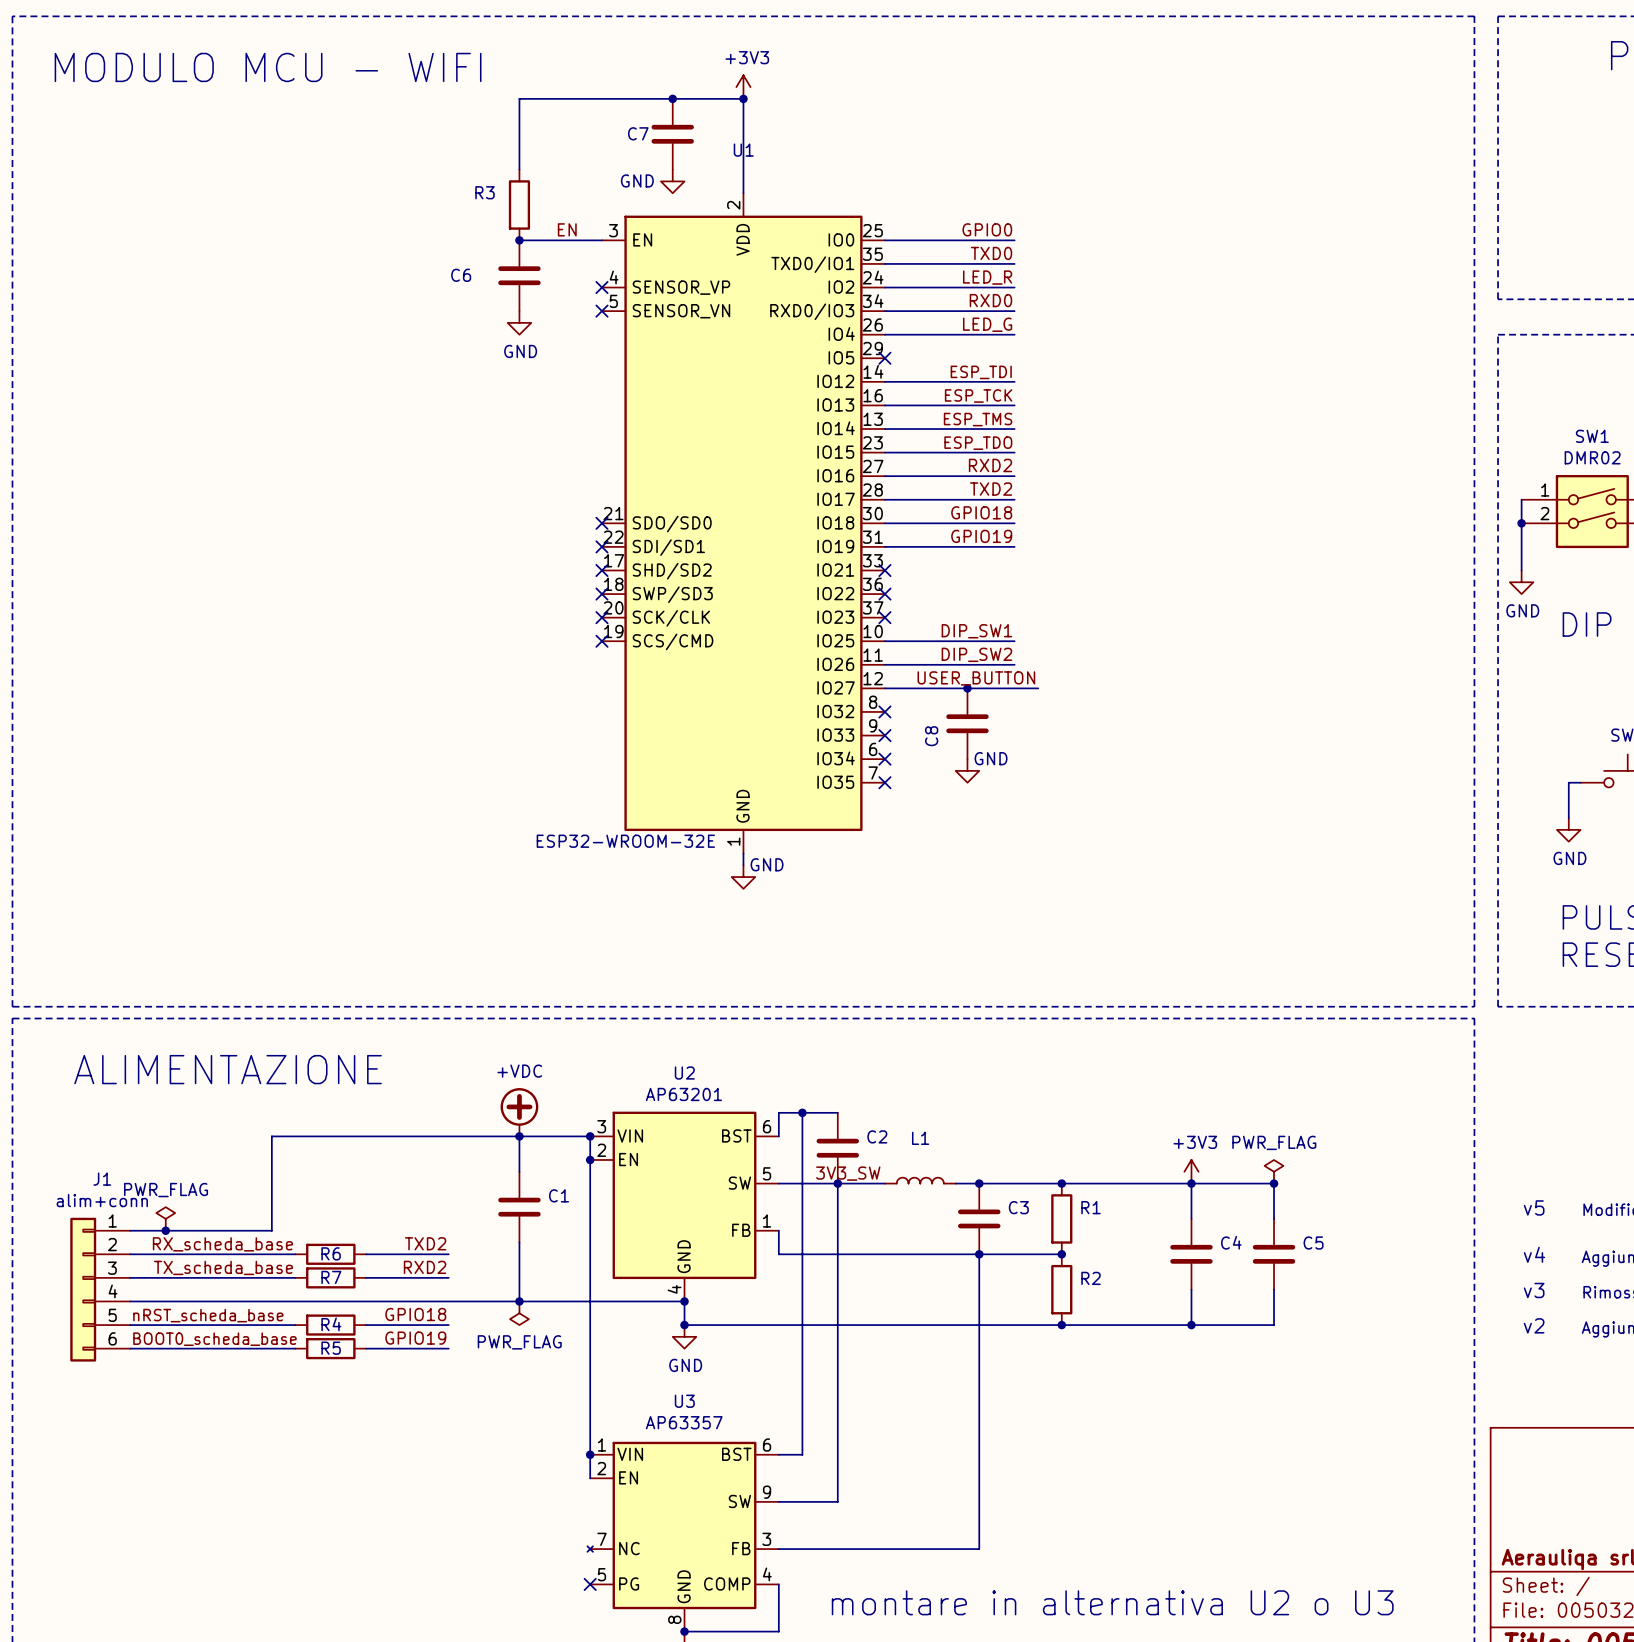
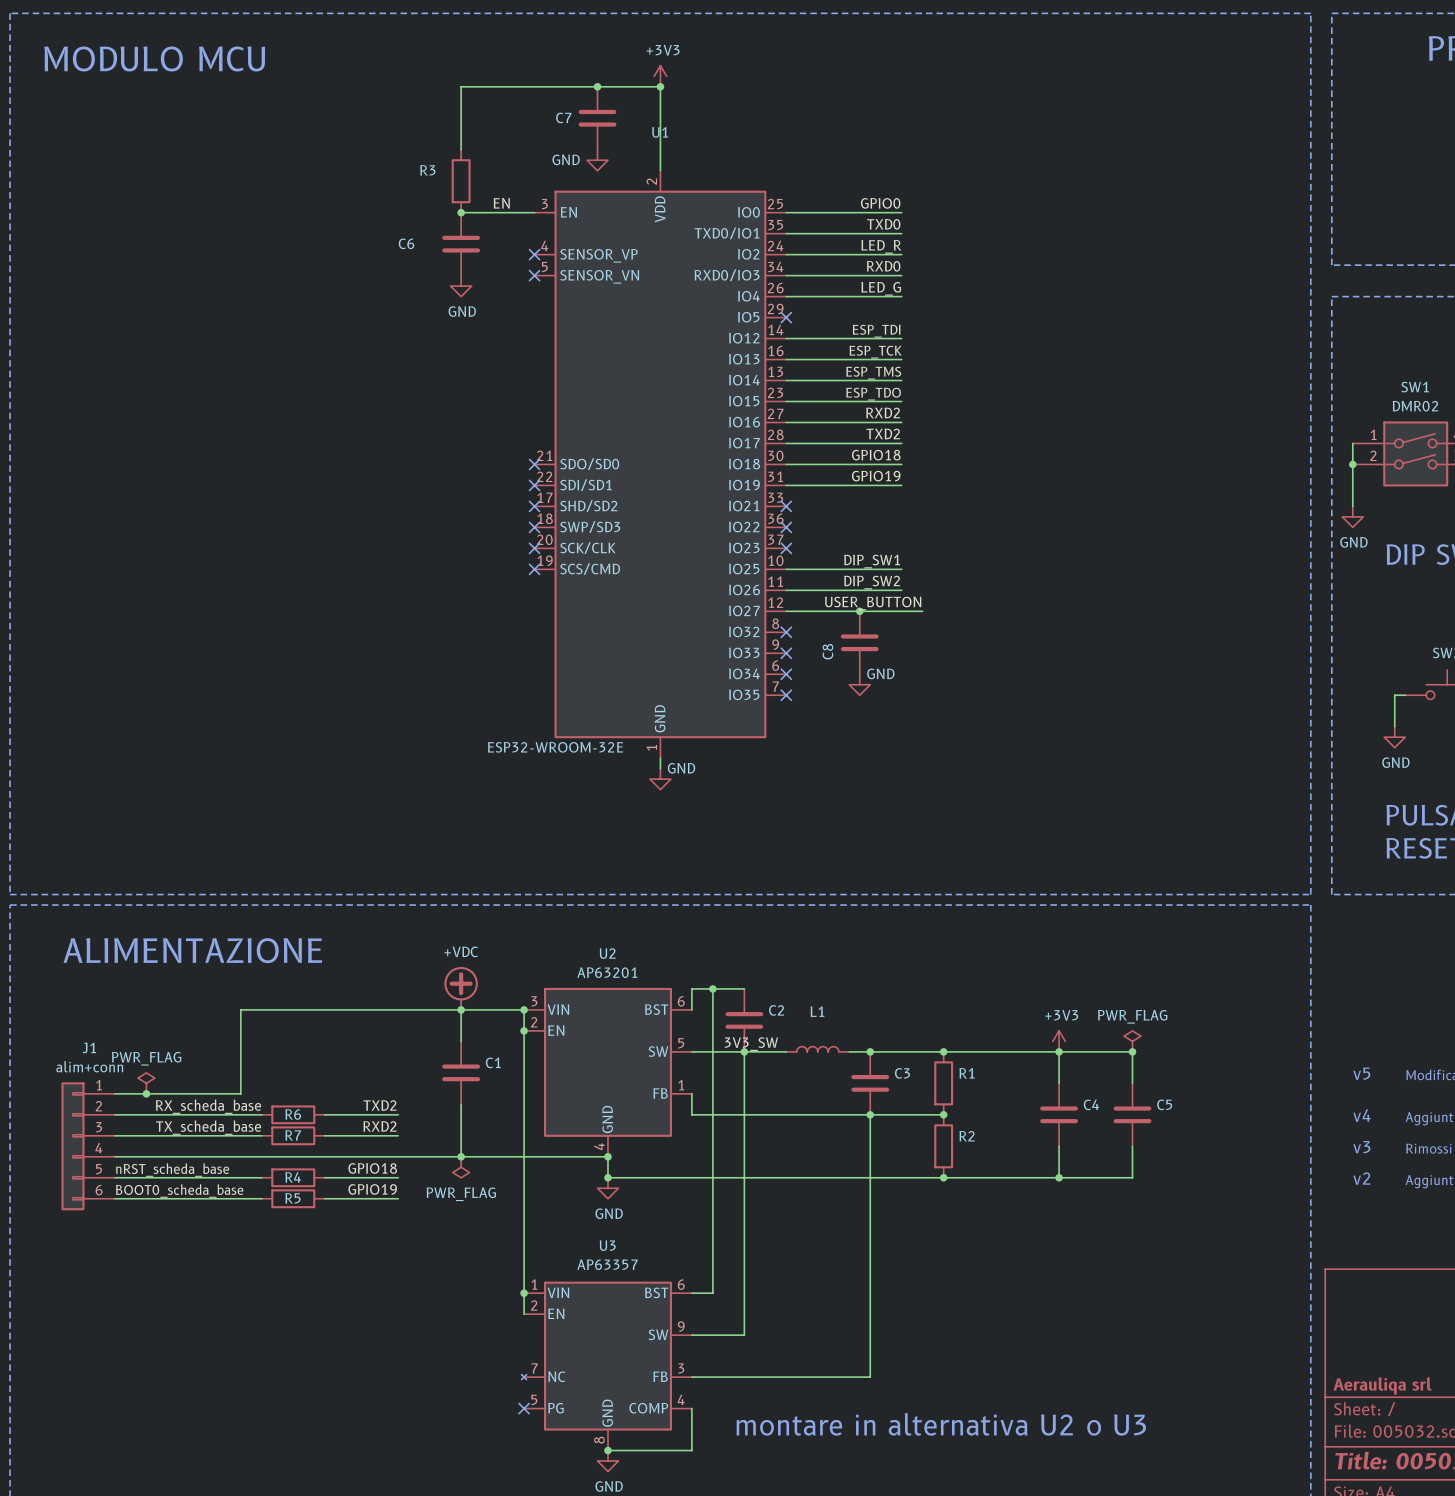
text: MODULO MCU - WIFI (268, 67) -> MODULO MCU (154, 58)

